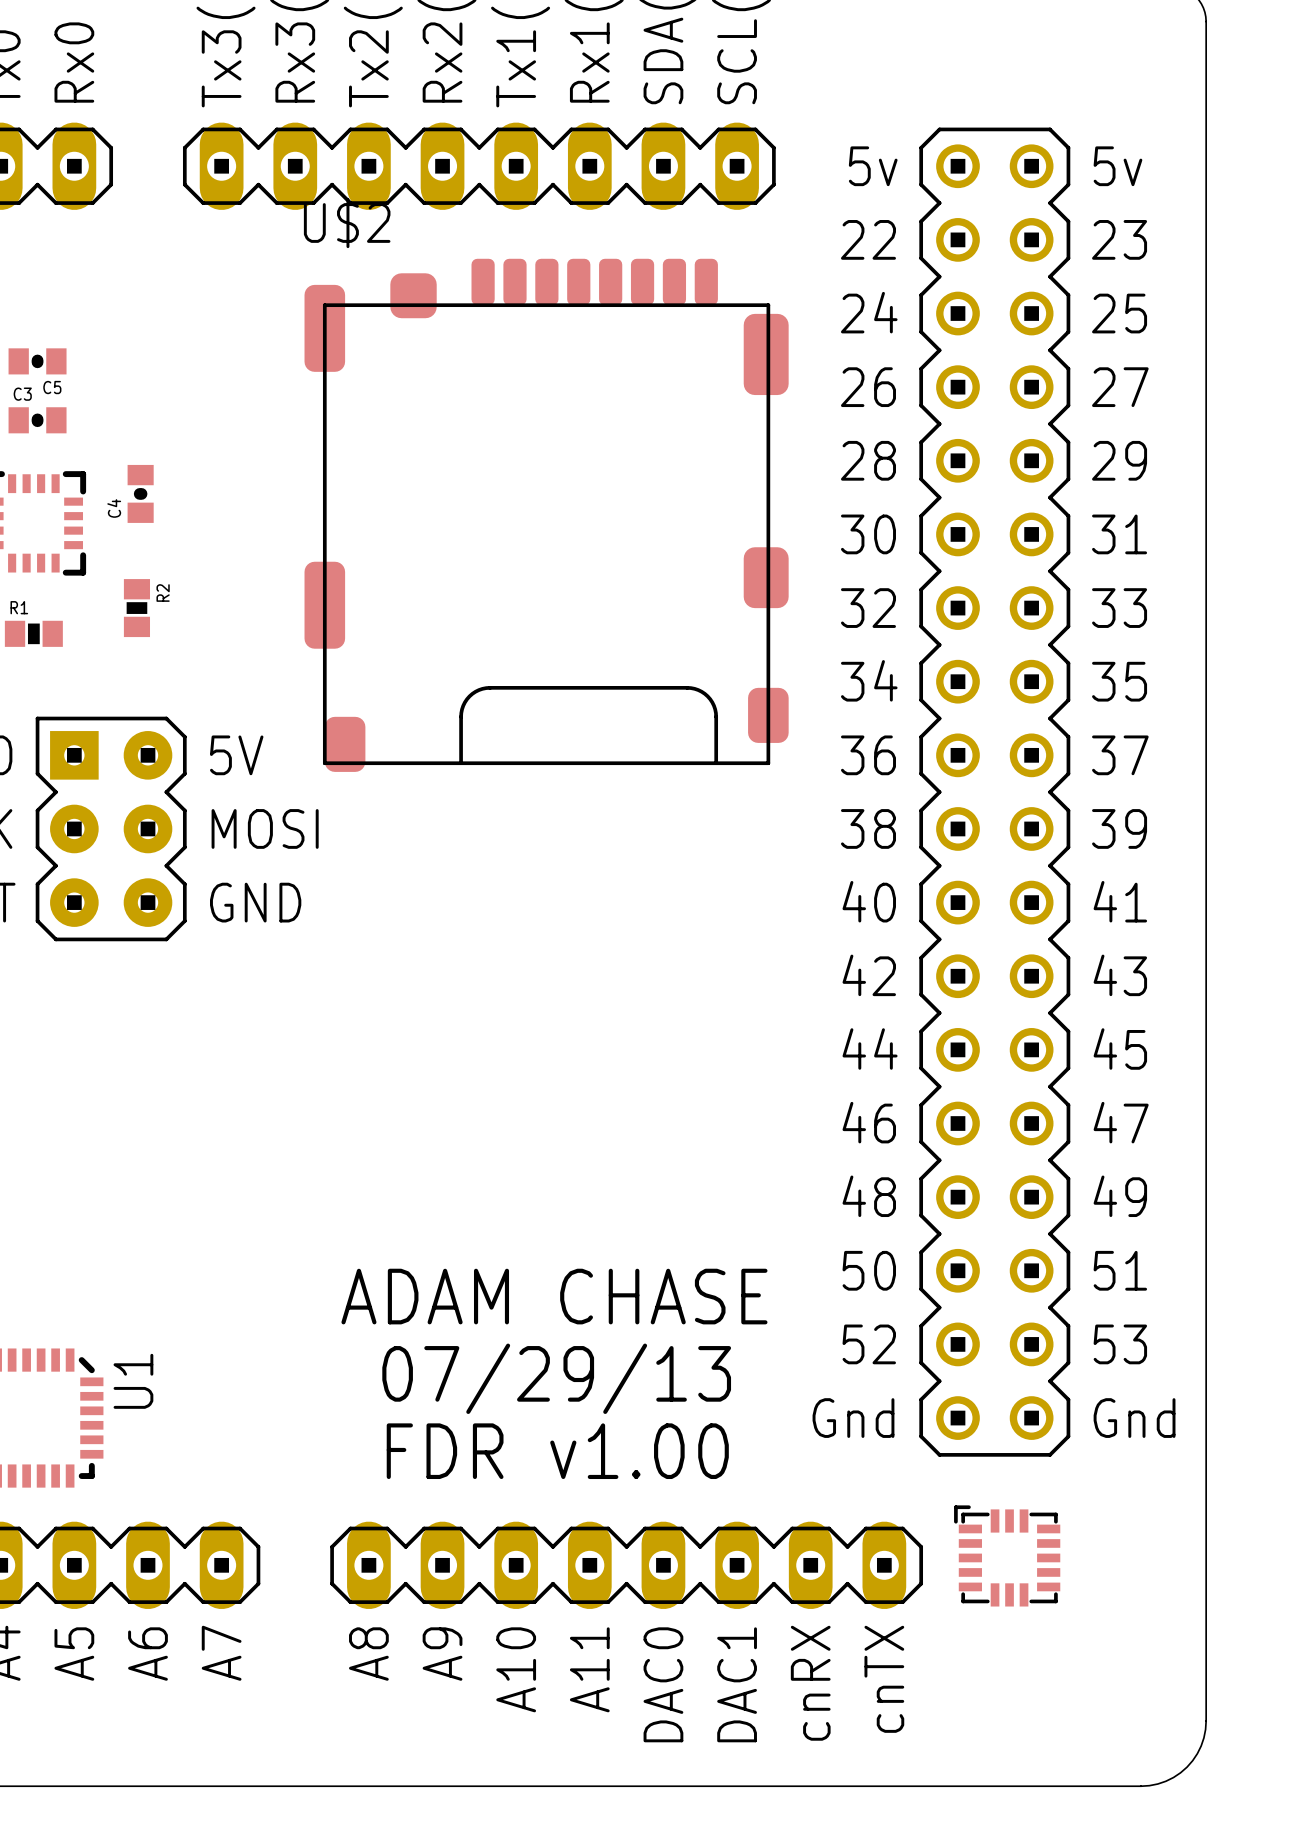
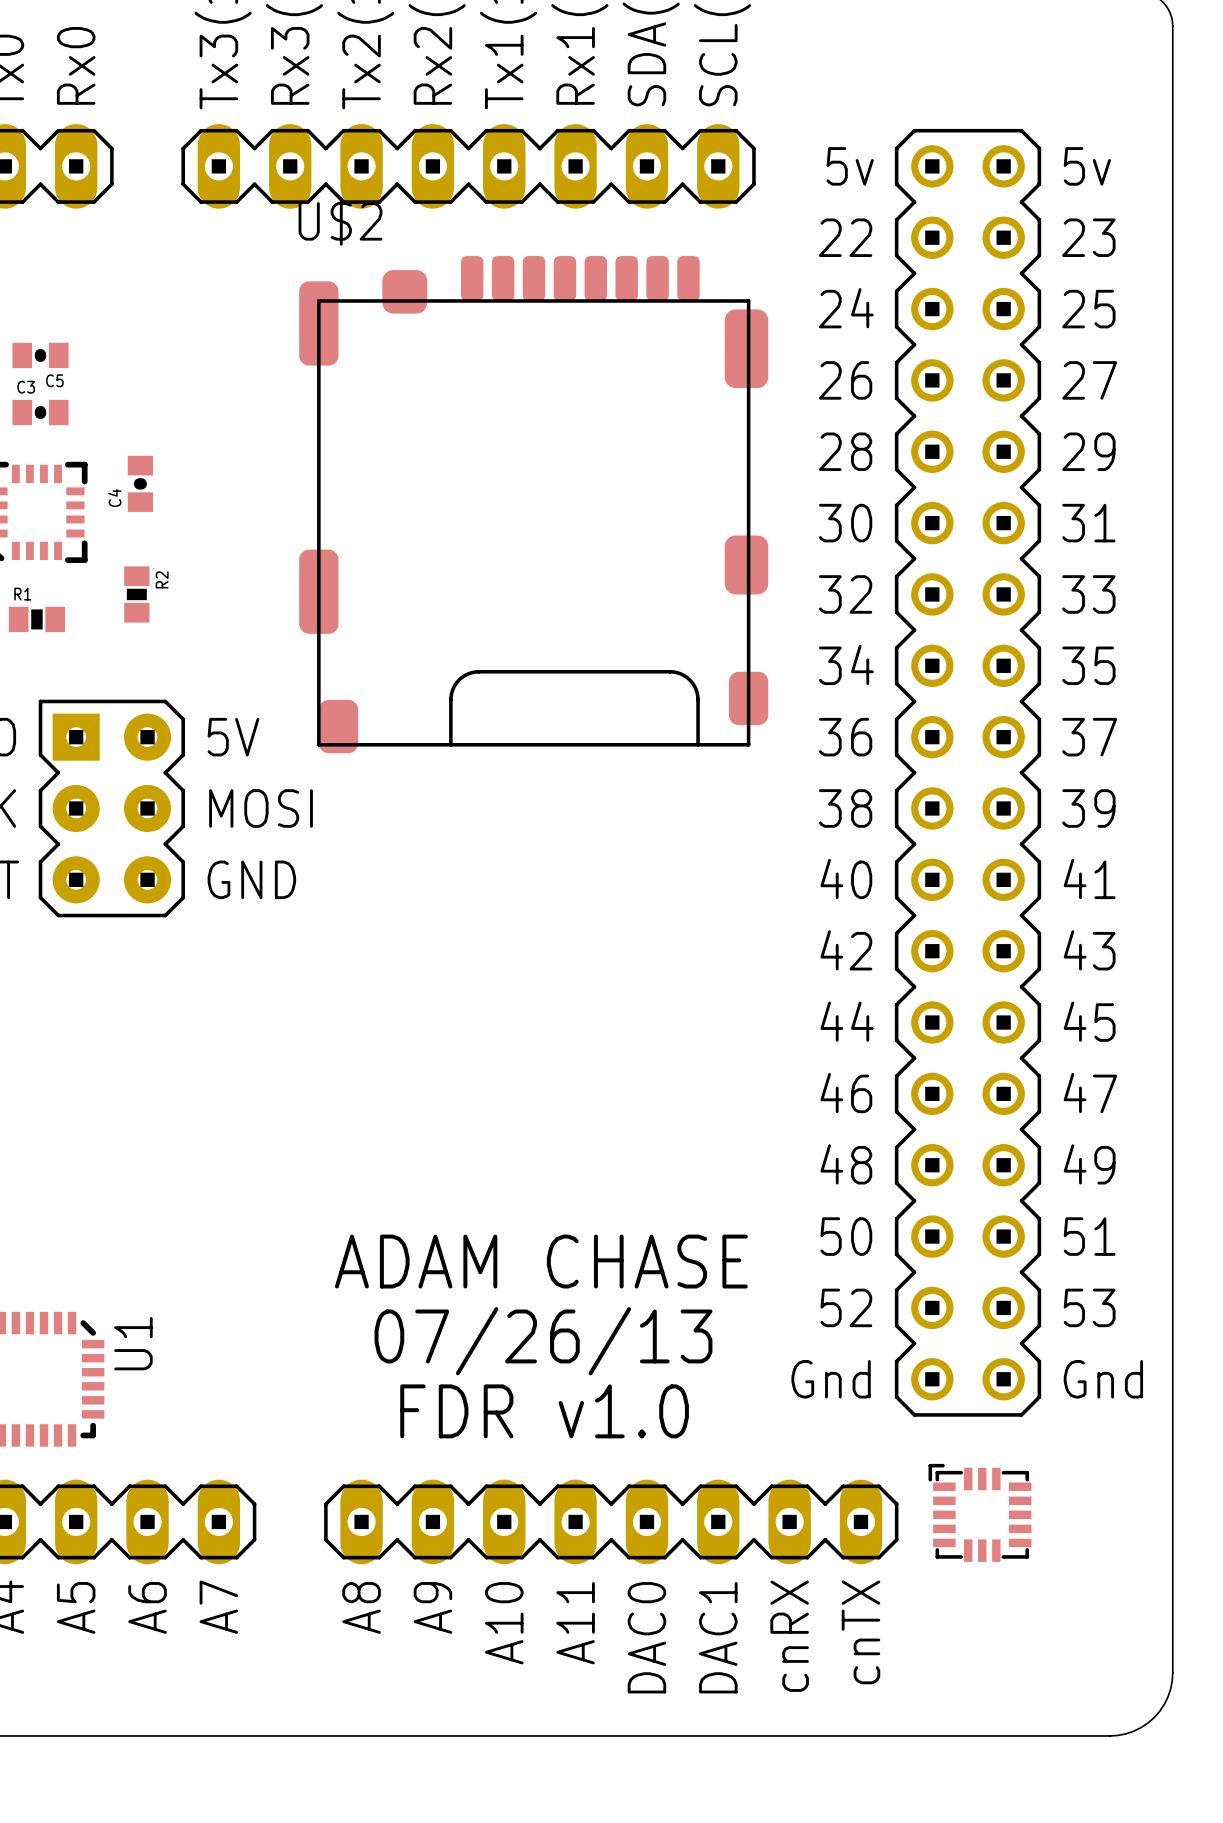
text: 07/29/13 (556, 1378) -> 07/26/13 (543, 1341)
text: FDR v1.00 (557, 1451) -> FDR v1.0 (544, 1411)

